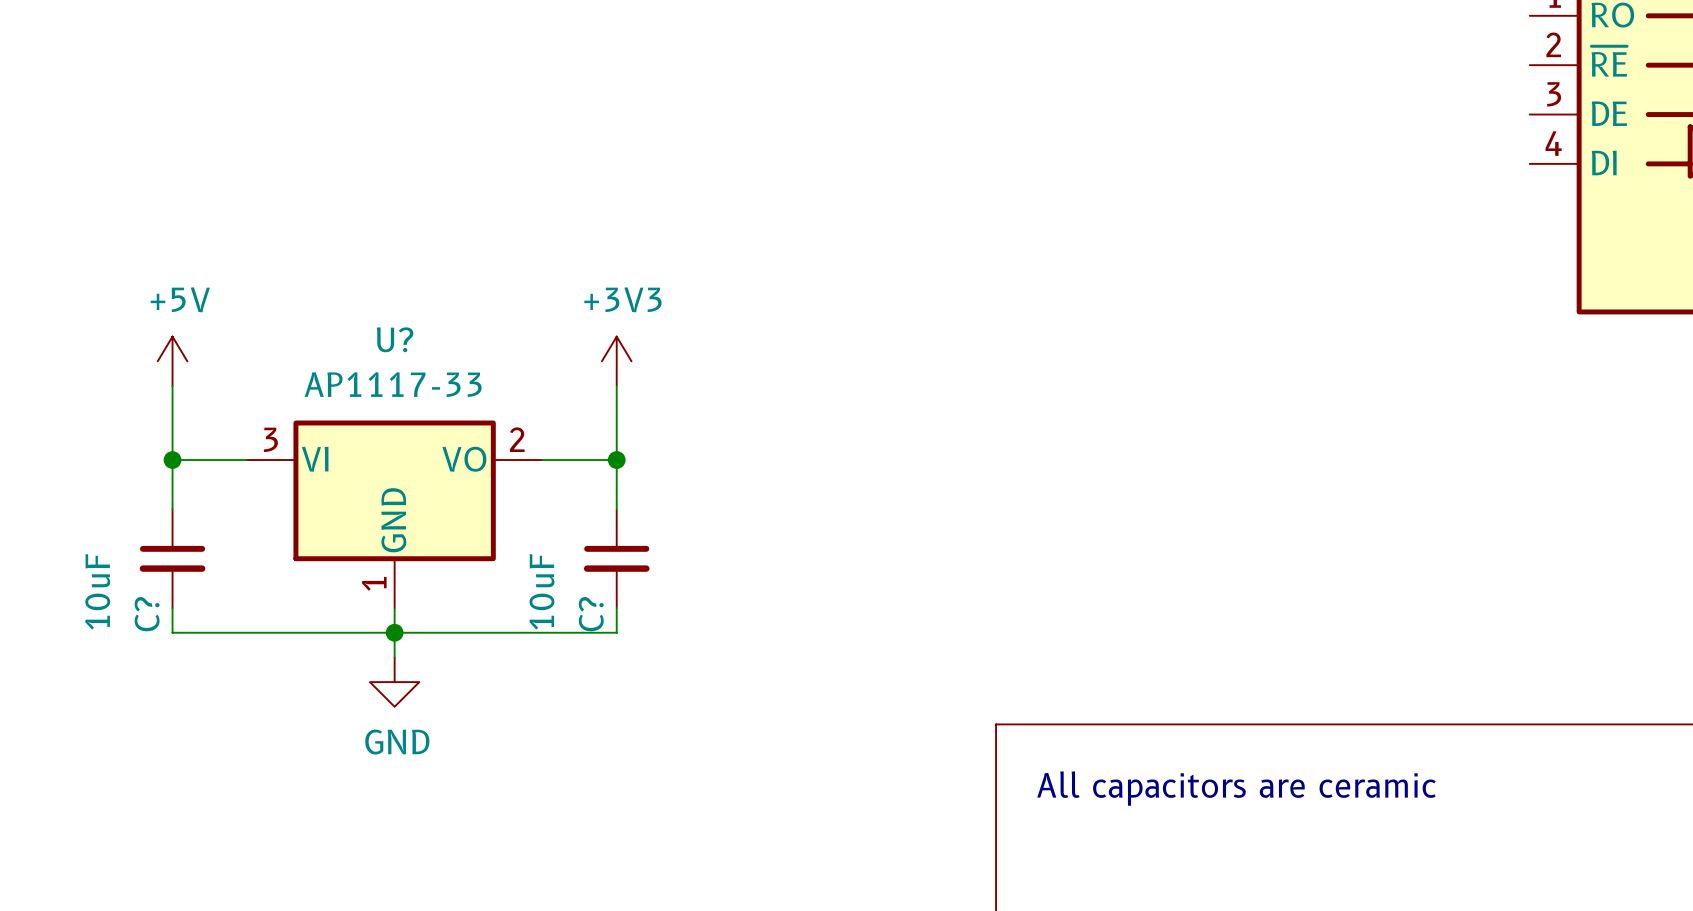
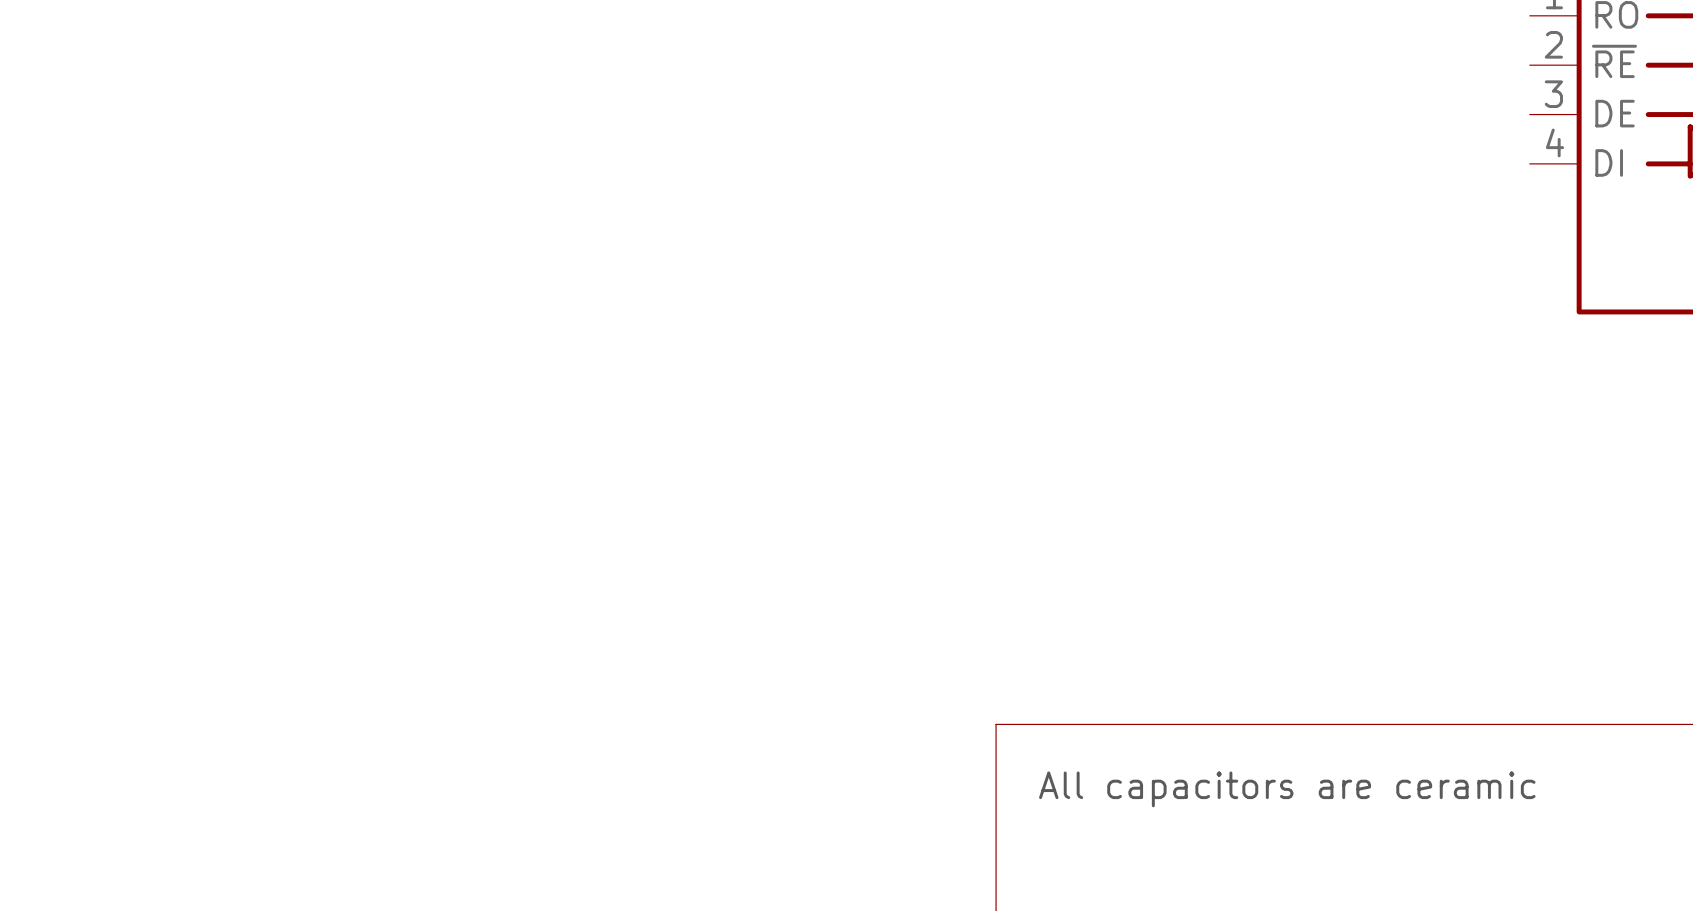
power symbol: +5V (172, 361) -> none
power symbol: +3V3 (616, 361) -> none
wire: (172, 385) (172, 509) -> none
wire: (616, 385) (616, 509) -> none
wire: (172, 460) (246, 460) -> none
junction: (172, 460) -> none
wire: (542, 460) (616, 460) -> none
junction: (616, 460) -> none
U?: AP1117-33 (394, 514) -> none
C?: 10uF (172, 558) -> none
C?: 10uF (616, 558) -> none
wire: (172, 608) (172, 632) (616, 632) (616, 608) -> none
wire: (394, 608) (394, 657) -> none
junction: (394, 632) -> none
power symbol: GND (394, 682) -> none

